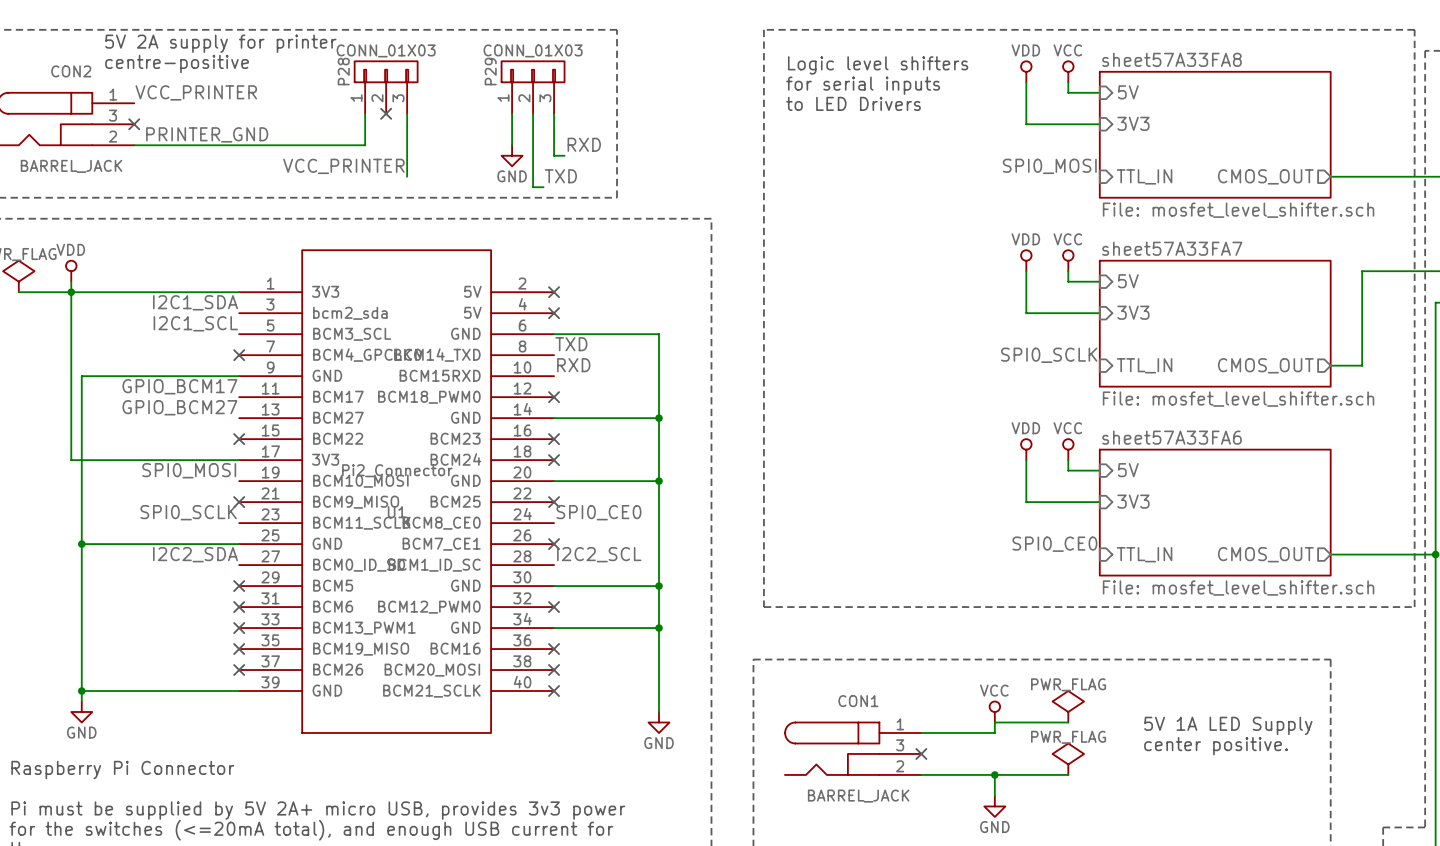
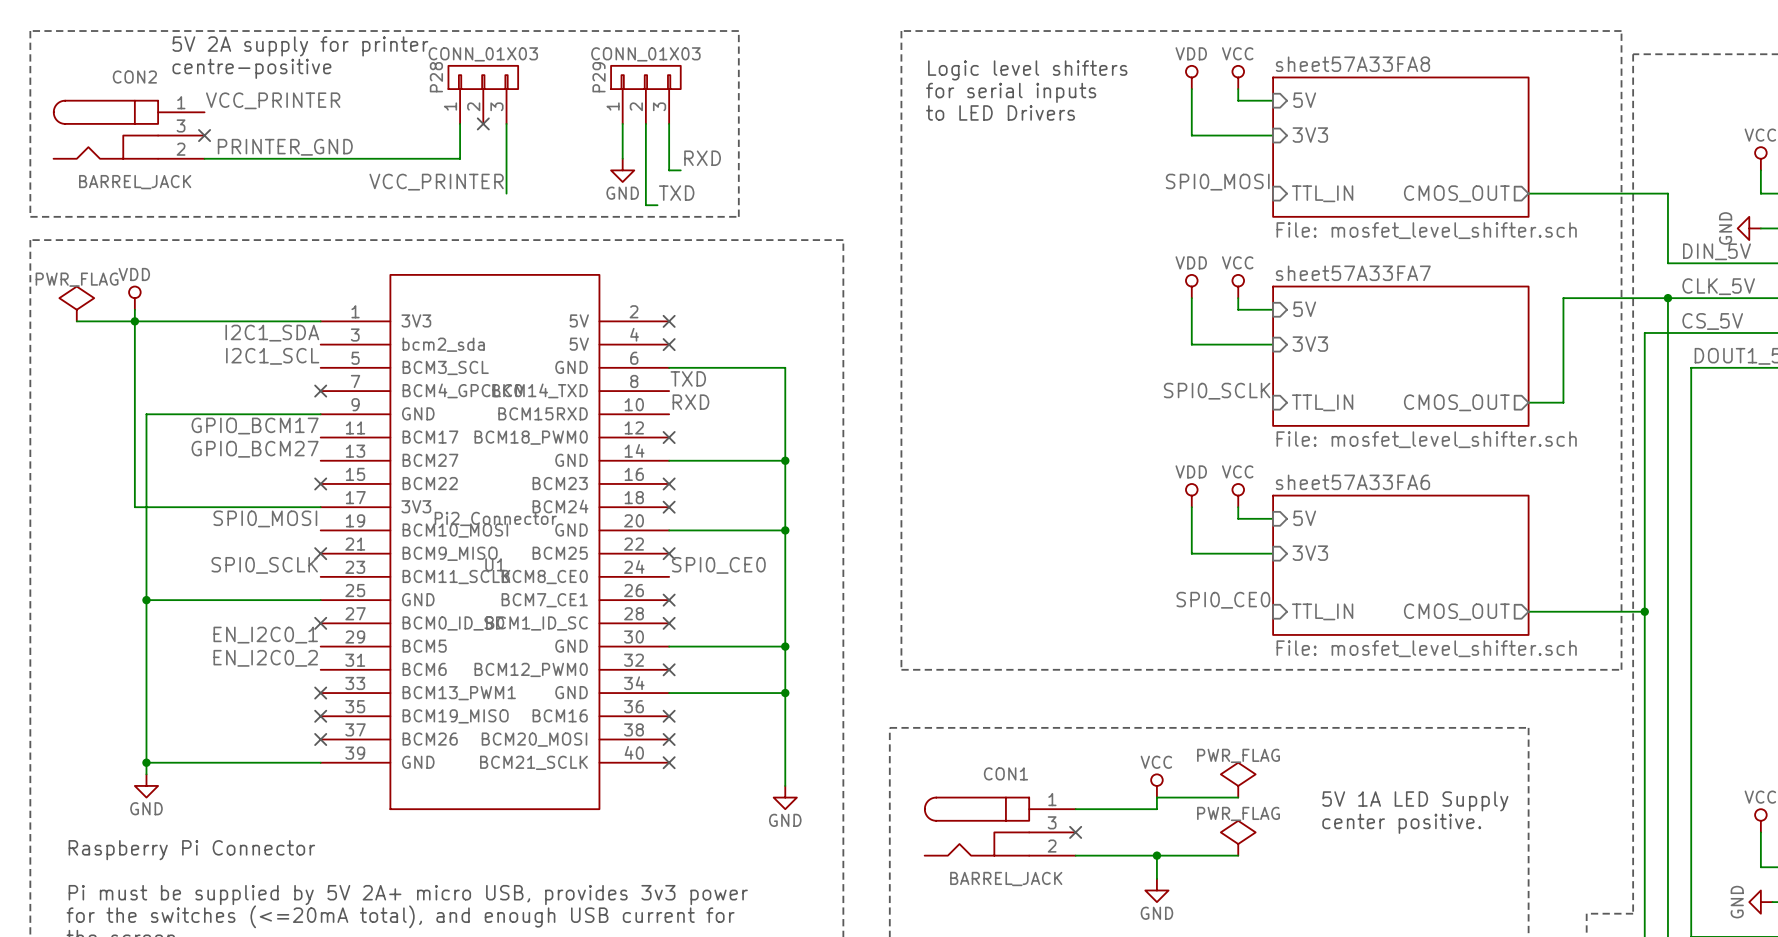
label: I2C2_SDA (195, 554) -> none
label: I2C2_SCL (599, 554) -> none
no-connect mark: none -> (320, 623)
no-connect mark: none -> (669, 623)
label: none -> EN_I2C0_1 (265, 635)
no-connect mark: (239, 586) -> none
label: none -> EN_I2C0_2 (265, 658)
no-connect mark: (239, 607) -> none

